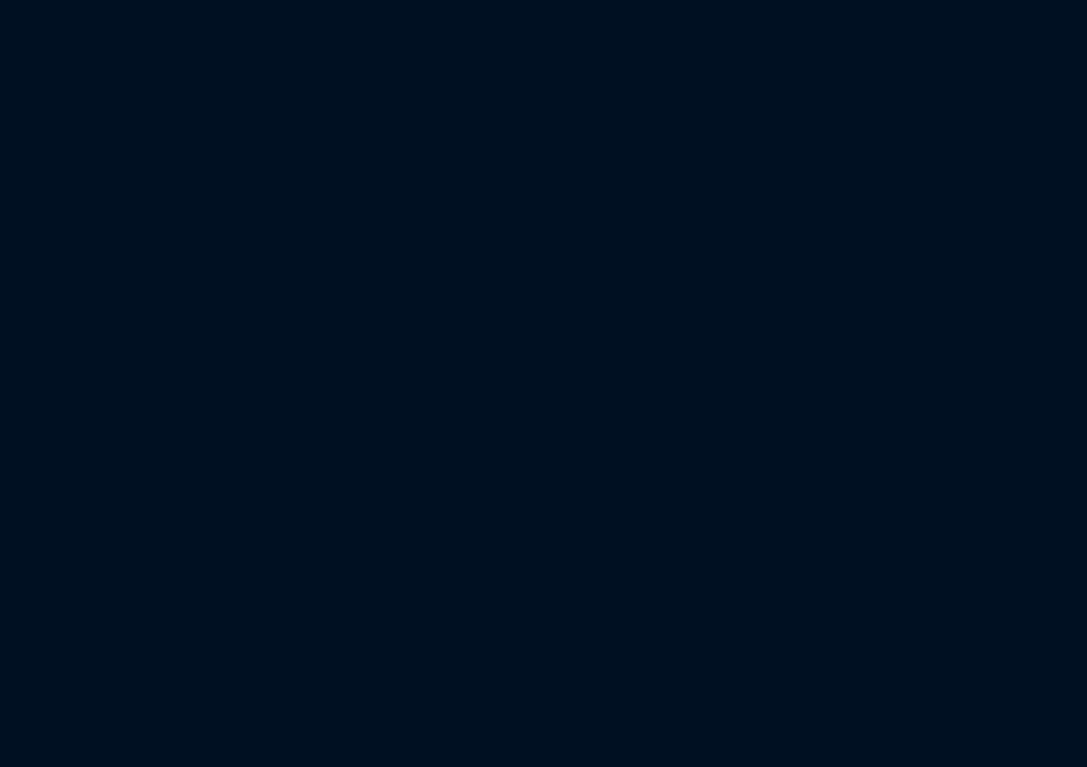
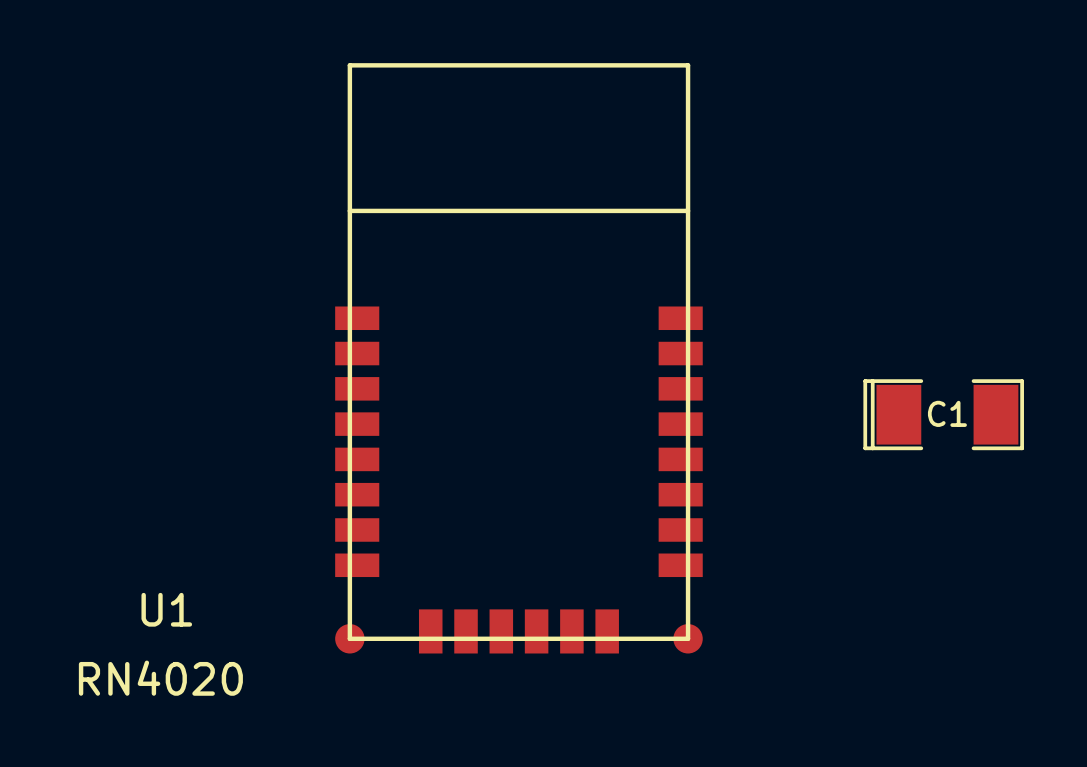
U1: none -> RN4020 (518, 358)
C1: none -> (943, 414)

